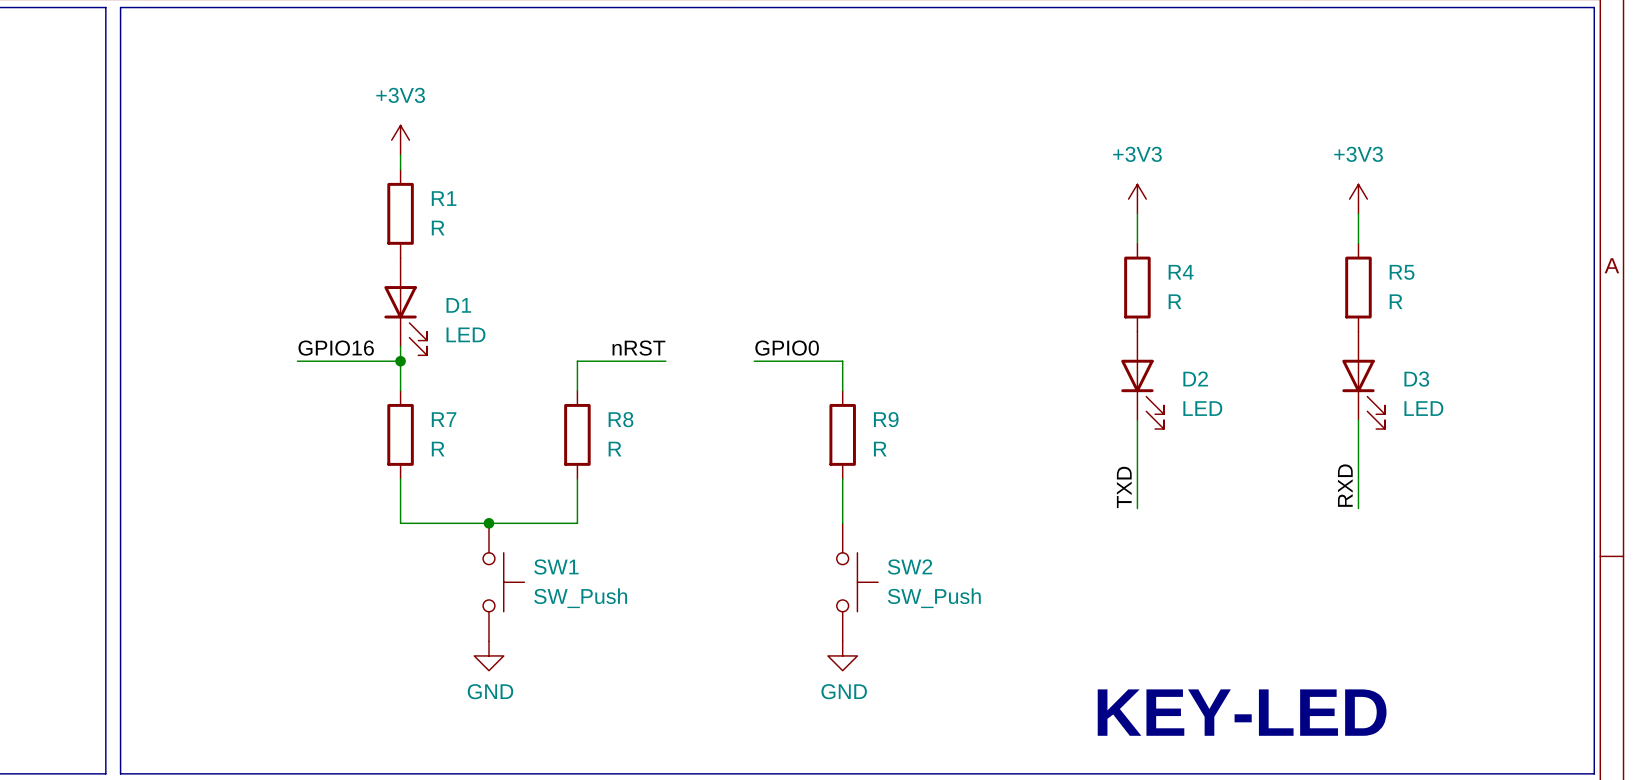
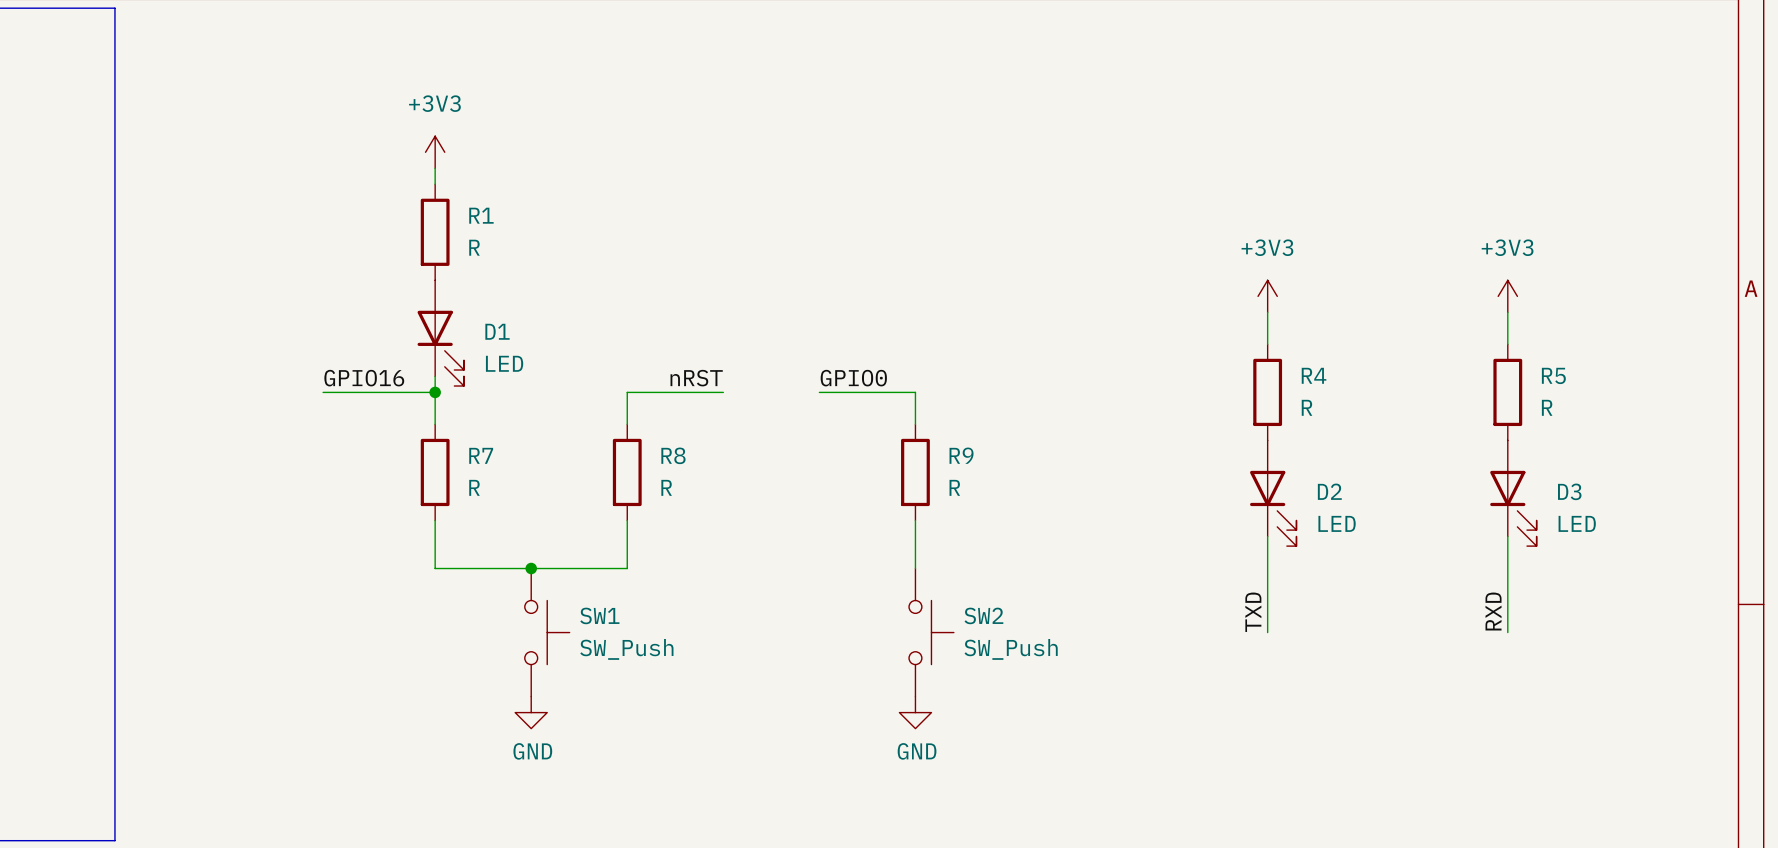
line: (120, 7) (1594, 7) (1594, 773) (120, 773) (120, 7) -> none
power symbol position: +3V3 (1137, 199) -> +3V3 (1267, 296)
power symbol position: +3V3 (1358, 199) -> +3V3 (1507, 296)
wire: (1137, 213) (1137, 243) -> (1267, 312) (1267, 344)
wire: (1358, 213) (1358, 243) -> (1507, 312) (1507, 344)
R4 position: (1137, 287) -> (1267, 392)
R5 position: (1358, 287) -> (1507, 392)
D2 position: (1142, 380) -> (1273, 493)
D3 position: (1363, 380) -> (1513, 493)
wire: (1137, 420) (1137, 508) -> (1267, 536) (1267, 632)
wire: (1358, 420) (1358, 508) -> (1507, 536) (1507, 632)
label position: RXD (1345, 485) -> RXD (1493, 611)
label position: TXD (1124, 487) -> TXD (1253, 612)
text: KEY-LED (1242, 712) -> none

